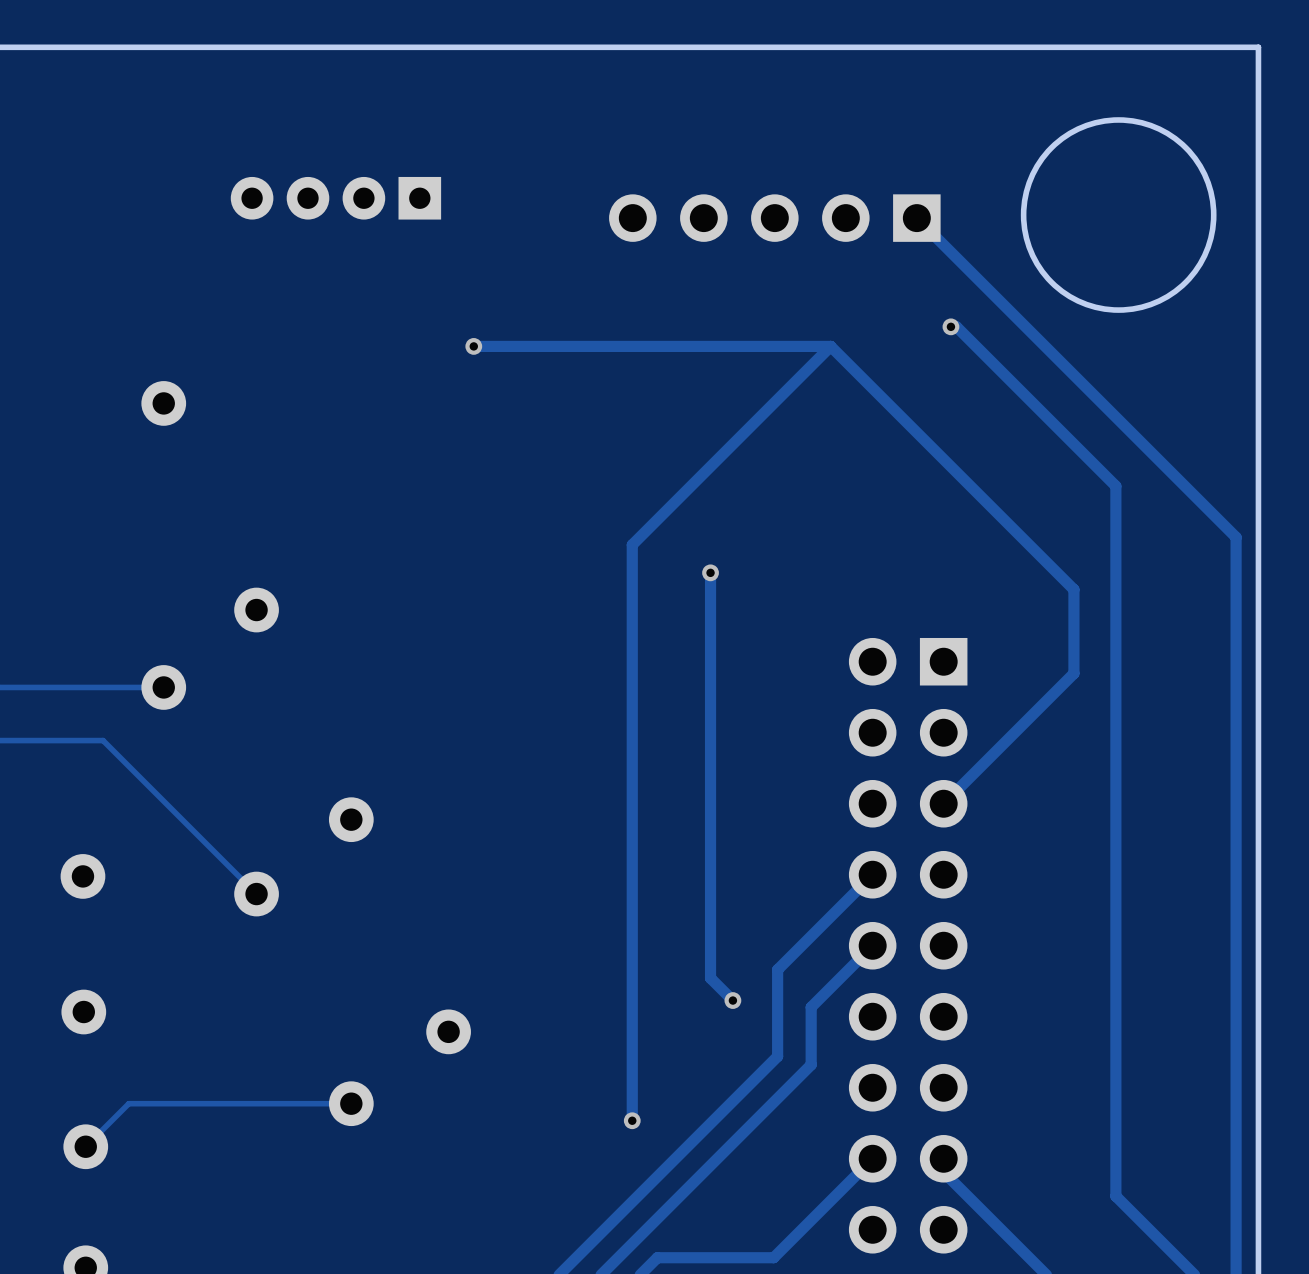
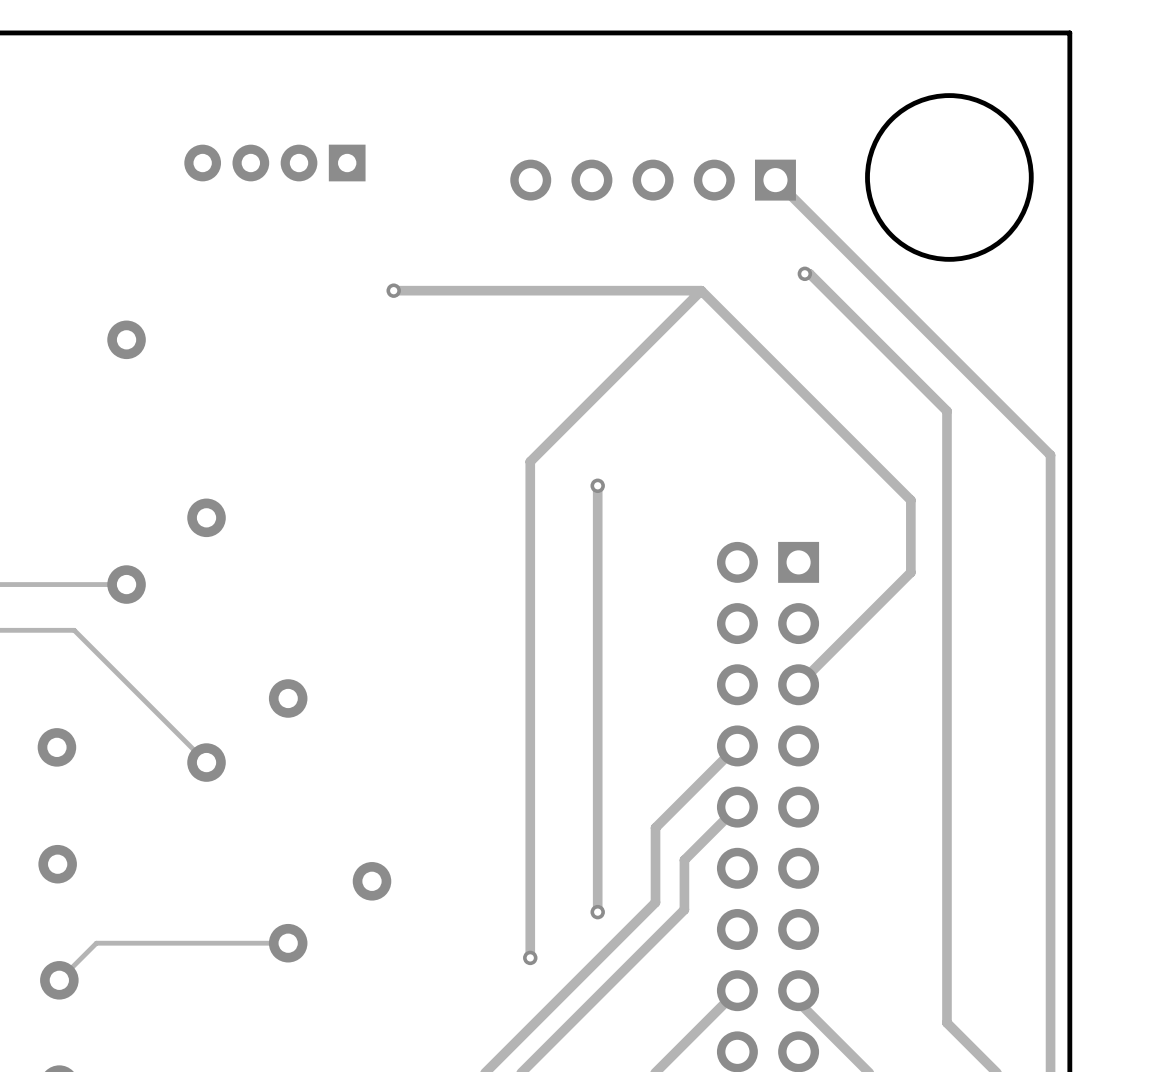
track: (710, 978) (732, 1000) -> (597, 835) (597, 912)
via position: (732, 1000) -> (597, 912)

